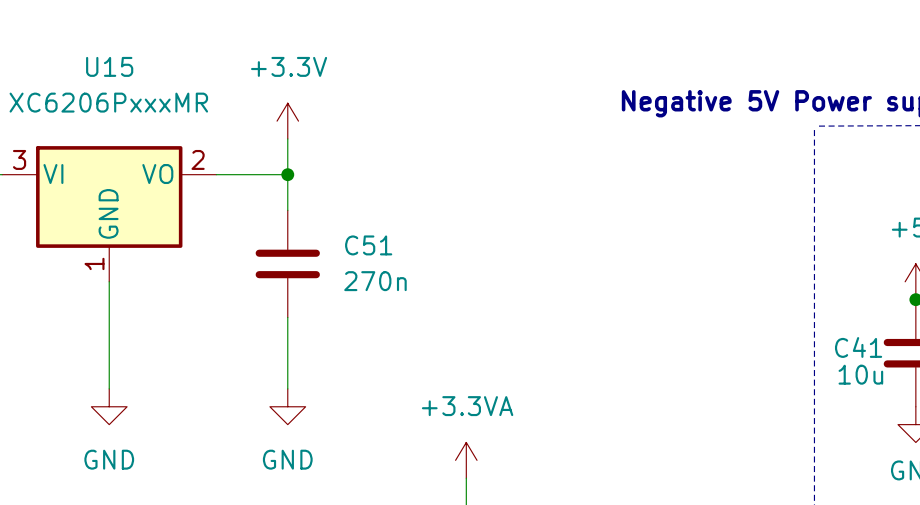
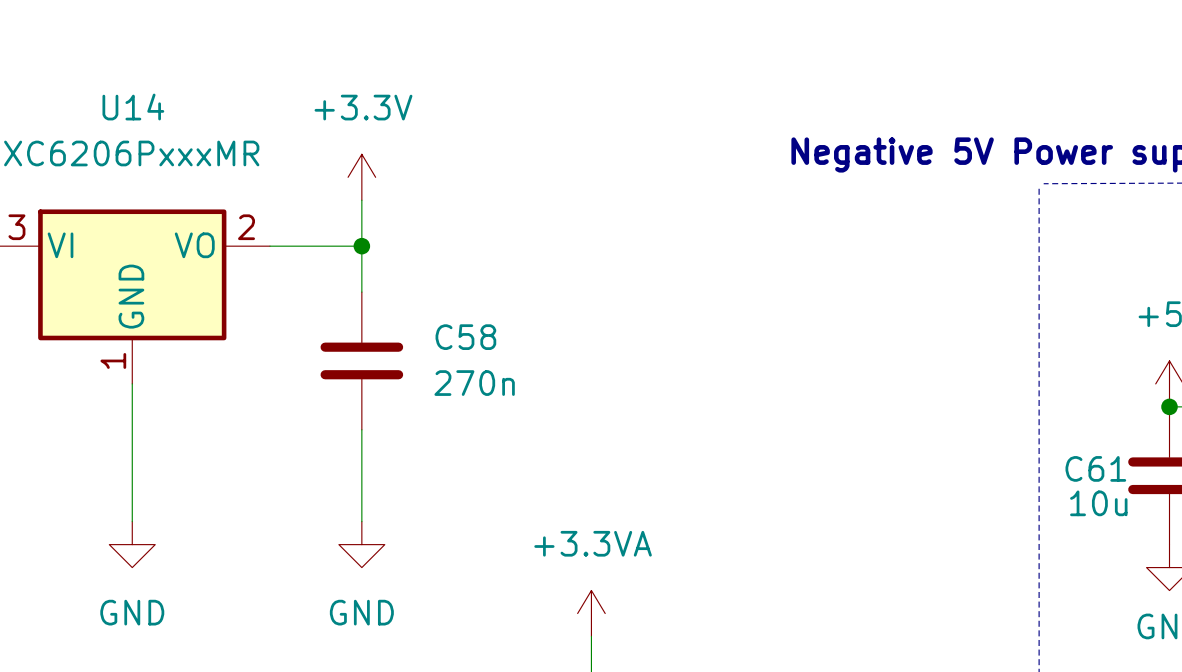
U15 name: U15 (109, 66) -> U14 (133, 107)
C51 name: C51 (368, 245) -> C58 (465, 337)
C41 name: C41 (858, 347) -> C61 (1095, 468)

